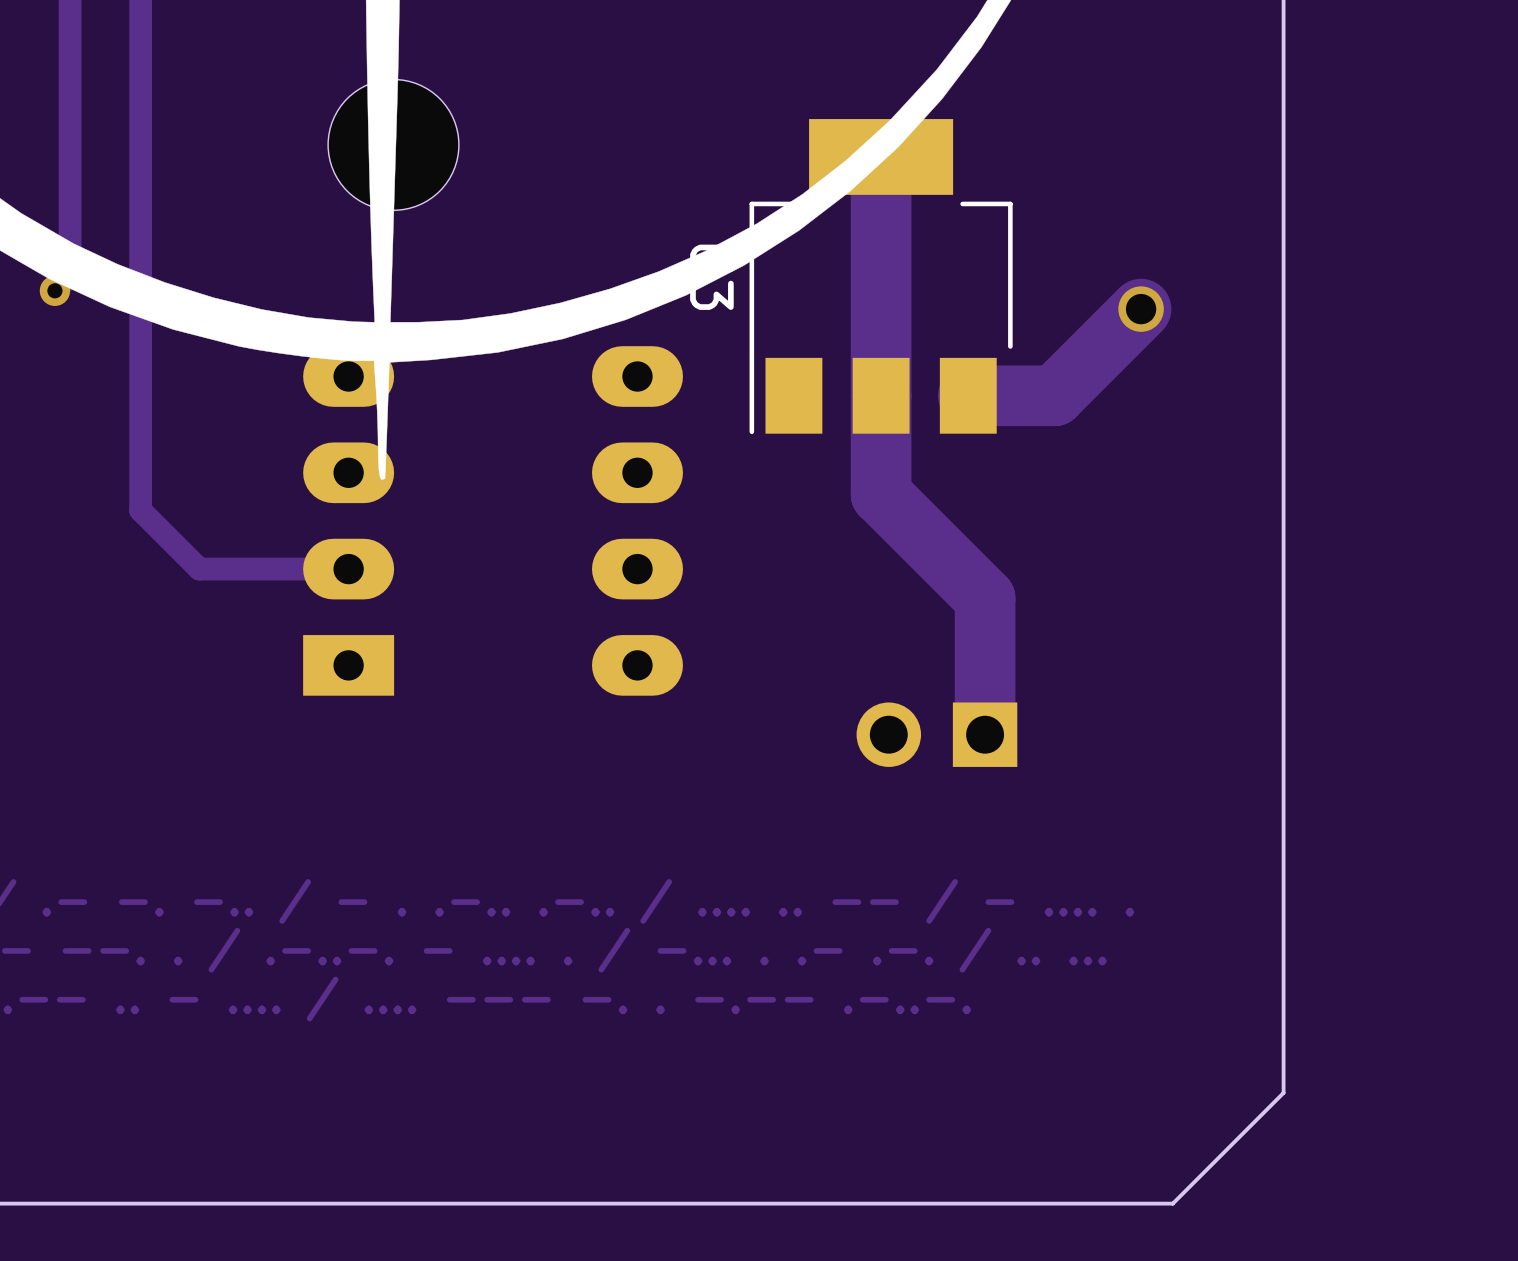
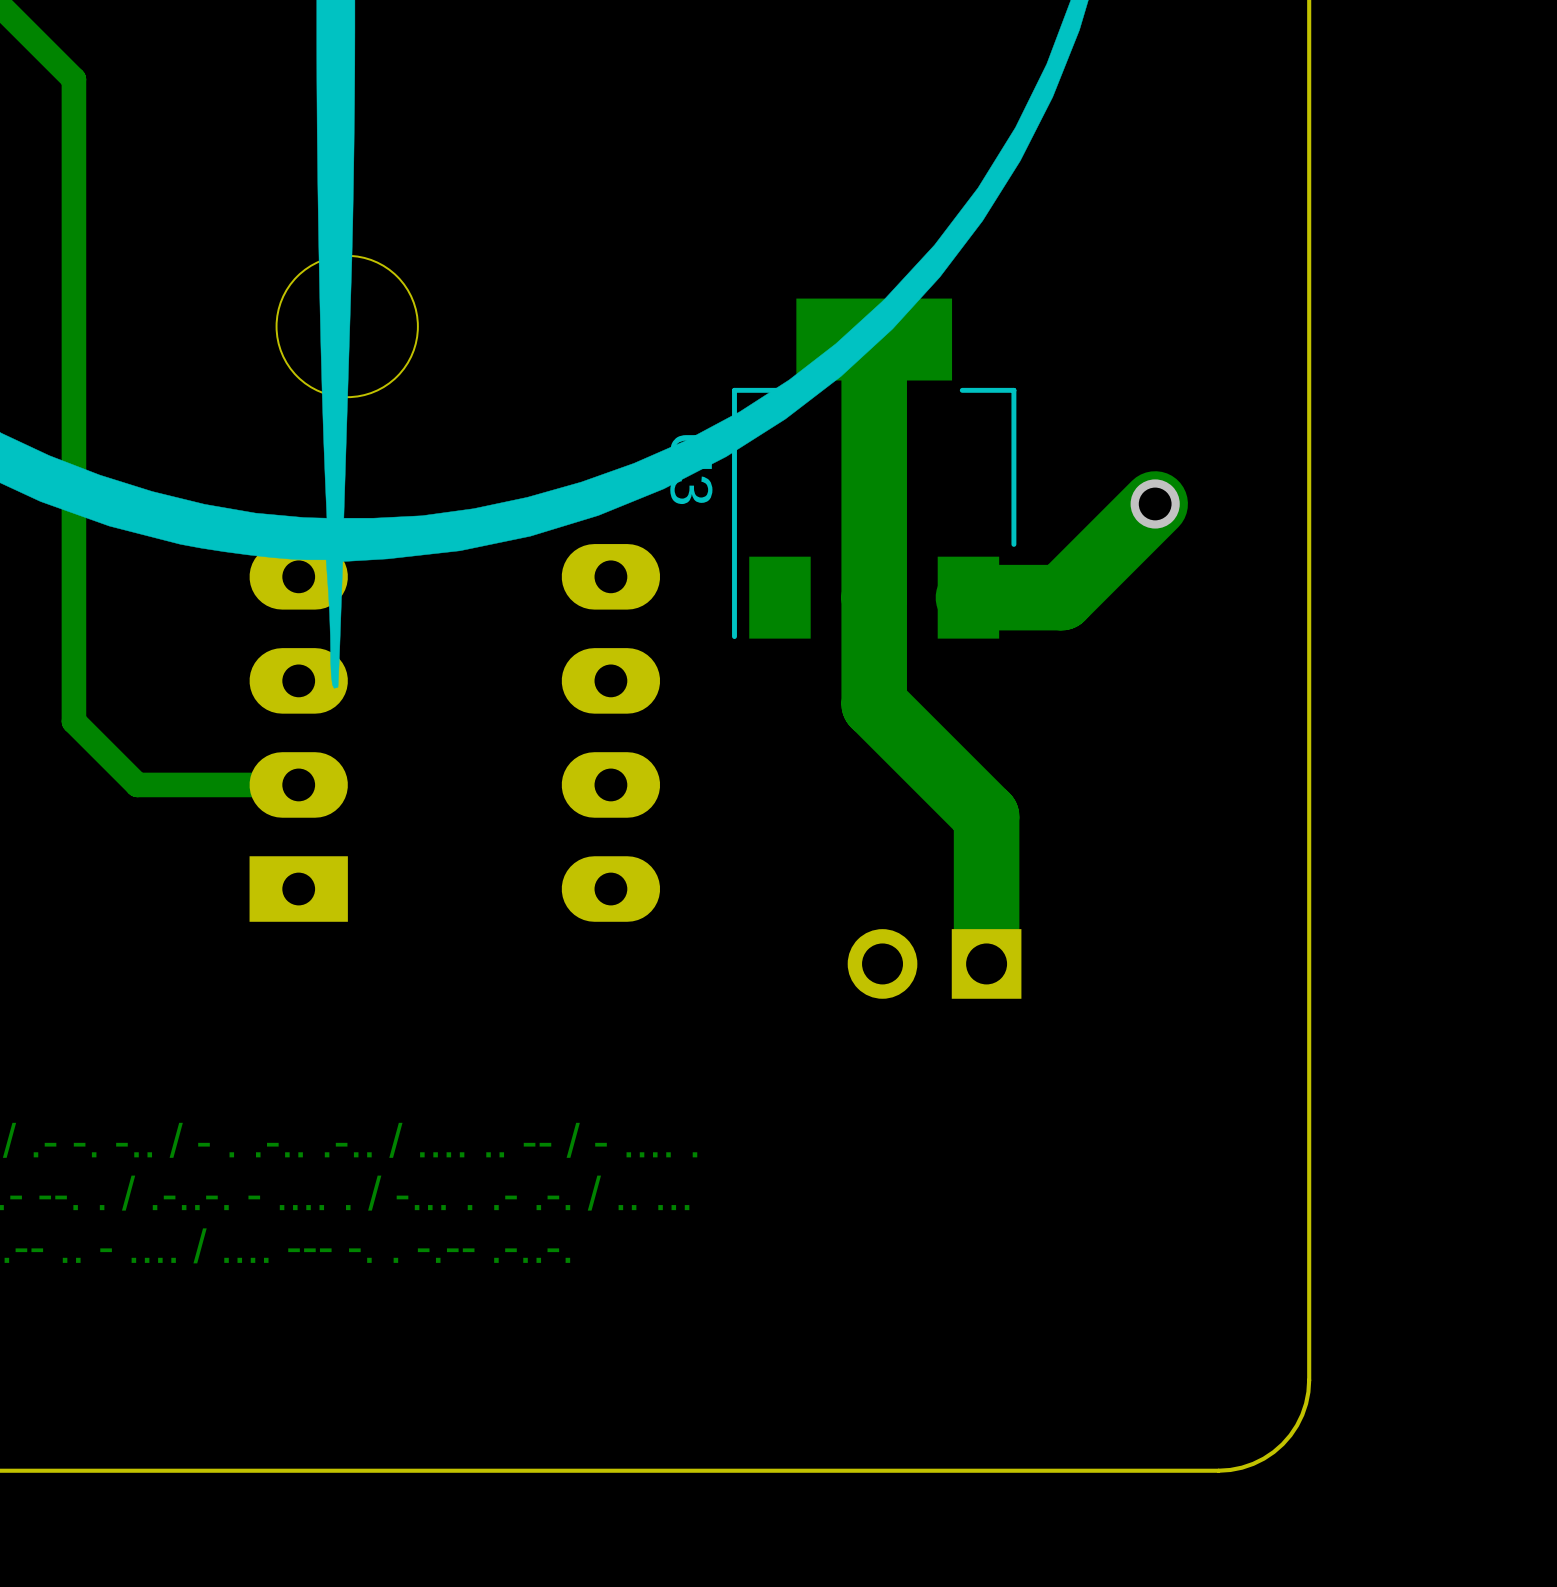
board edge: (1283, 1092) (1172, 1203) -> (1309, 1351) (1309, 1380) (1306, 1403) (1297, 1425) (1282, 1444) (1263, 1458) (1242, 1467) (1218, 1470) (1189, 1470)

